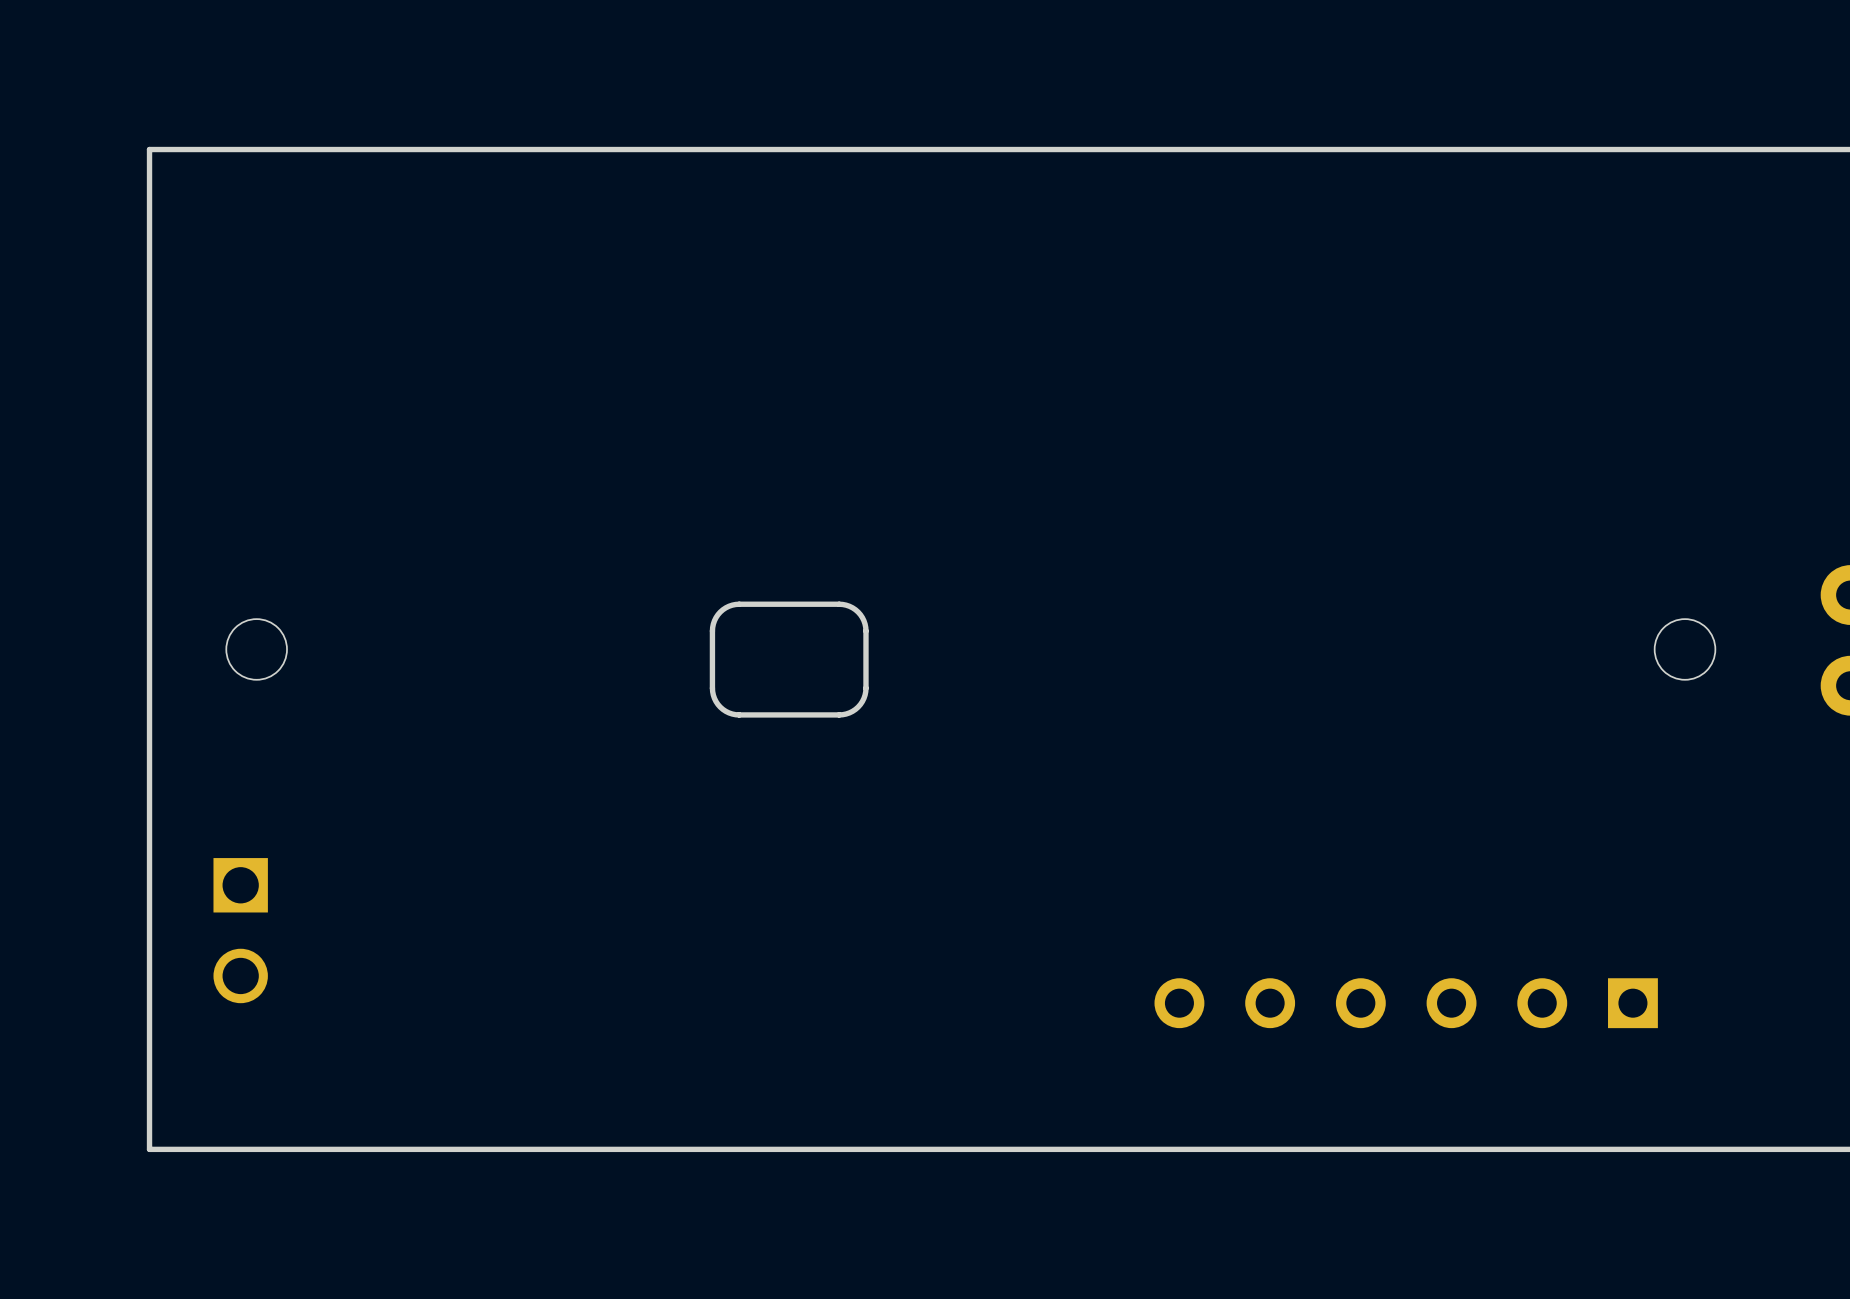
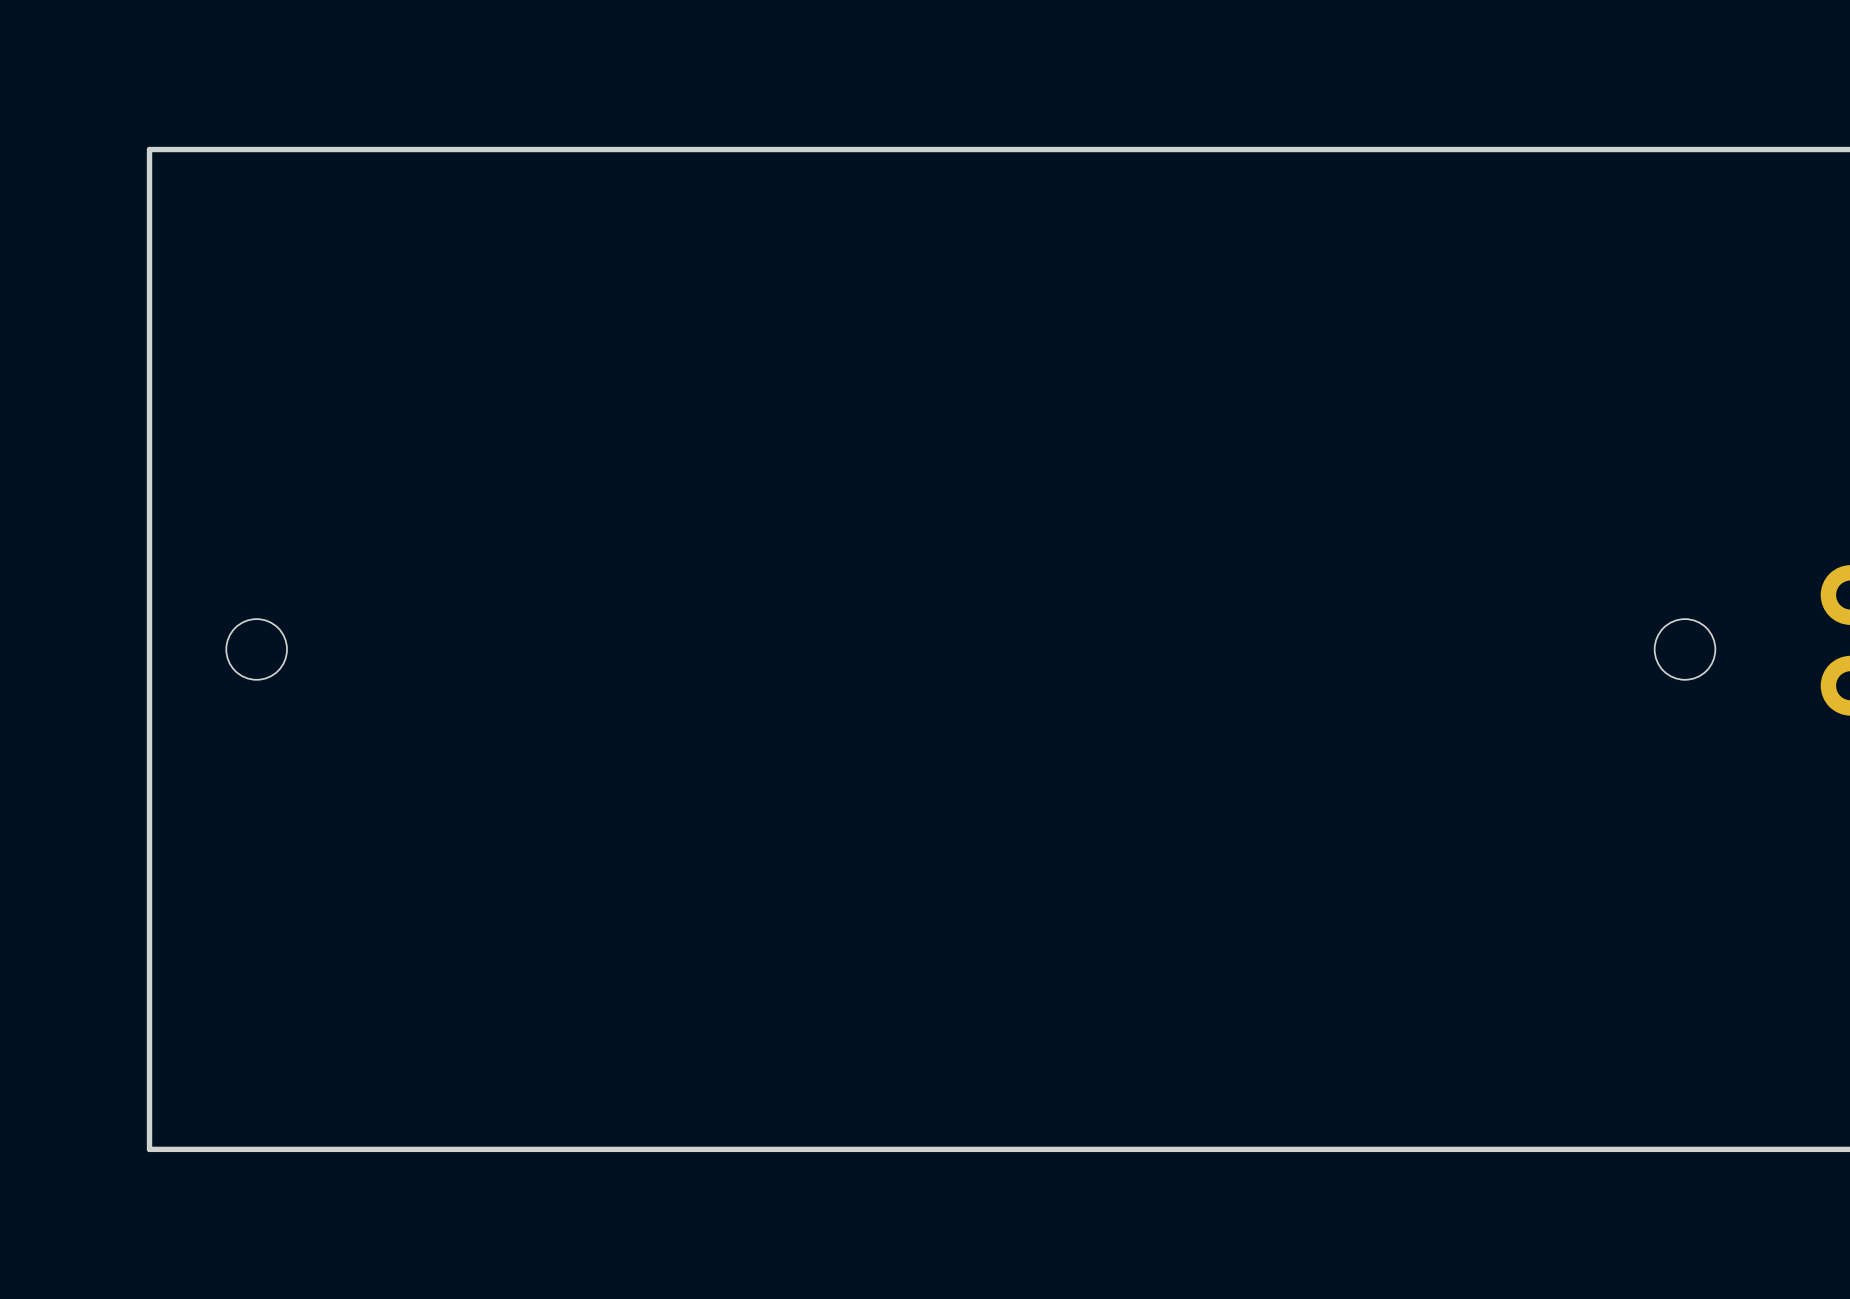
part: (789, 659) -> none
part: (240, 930) -> none
part: (1406, 1003) -> none

